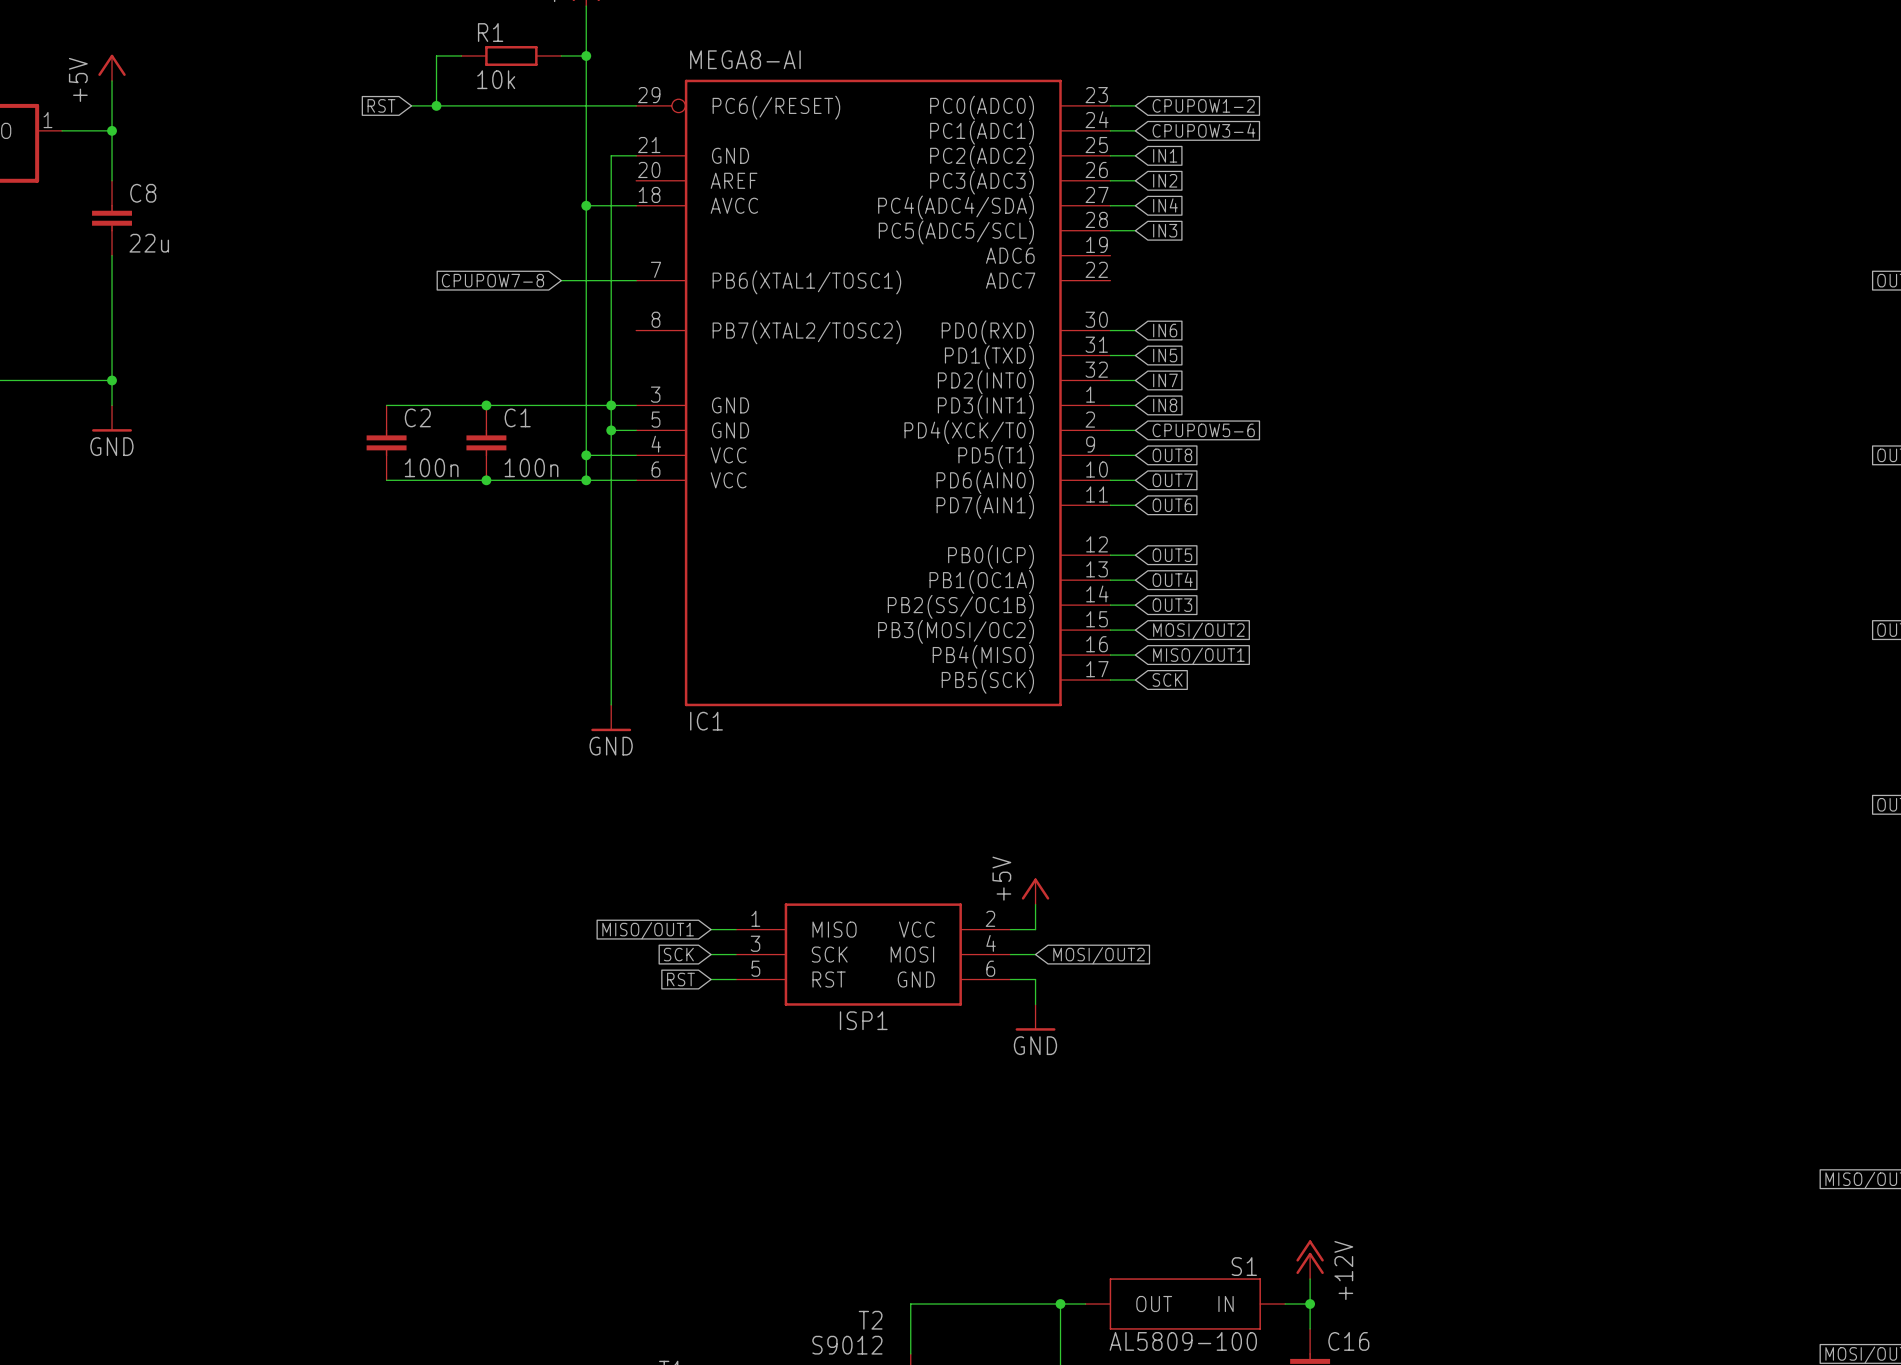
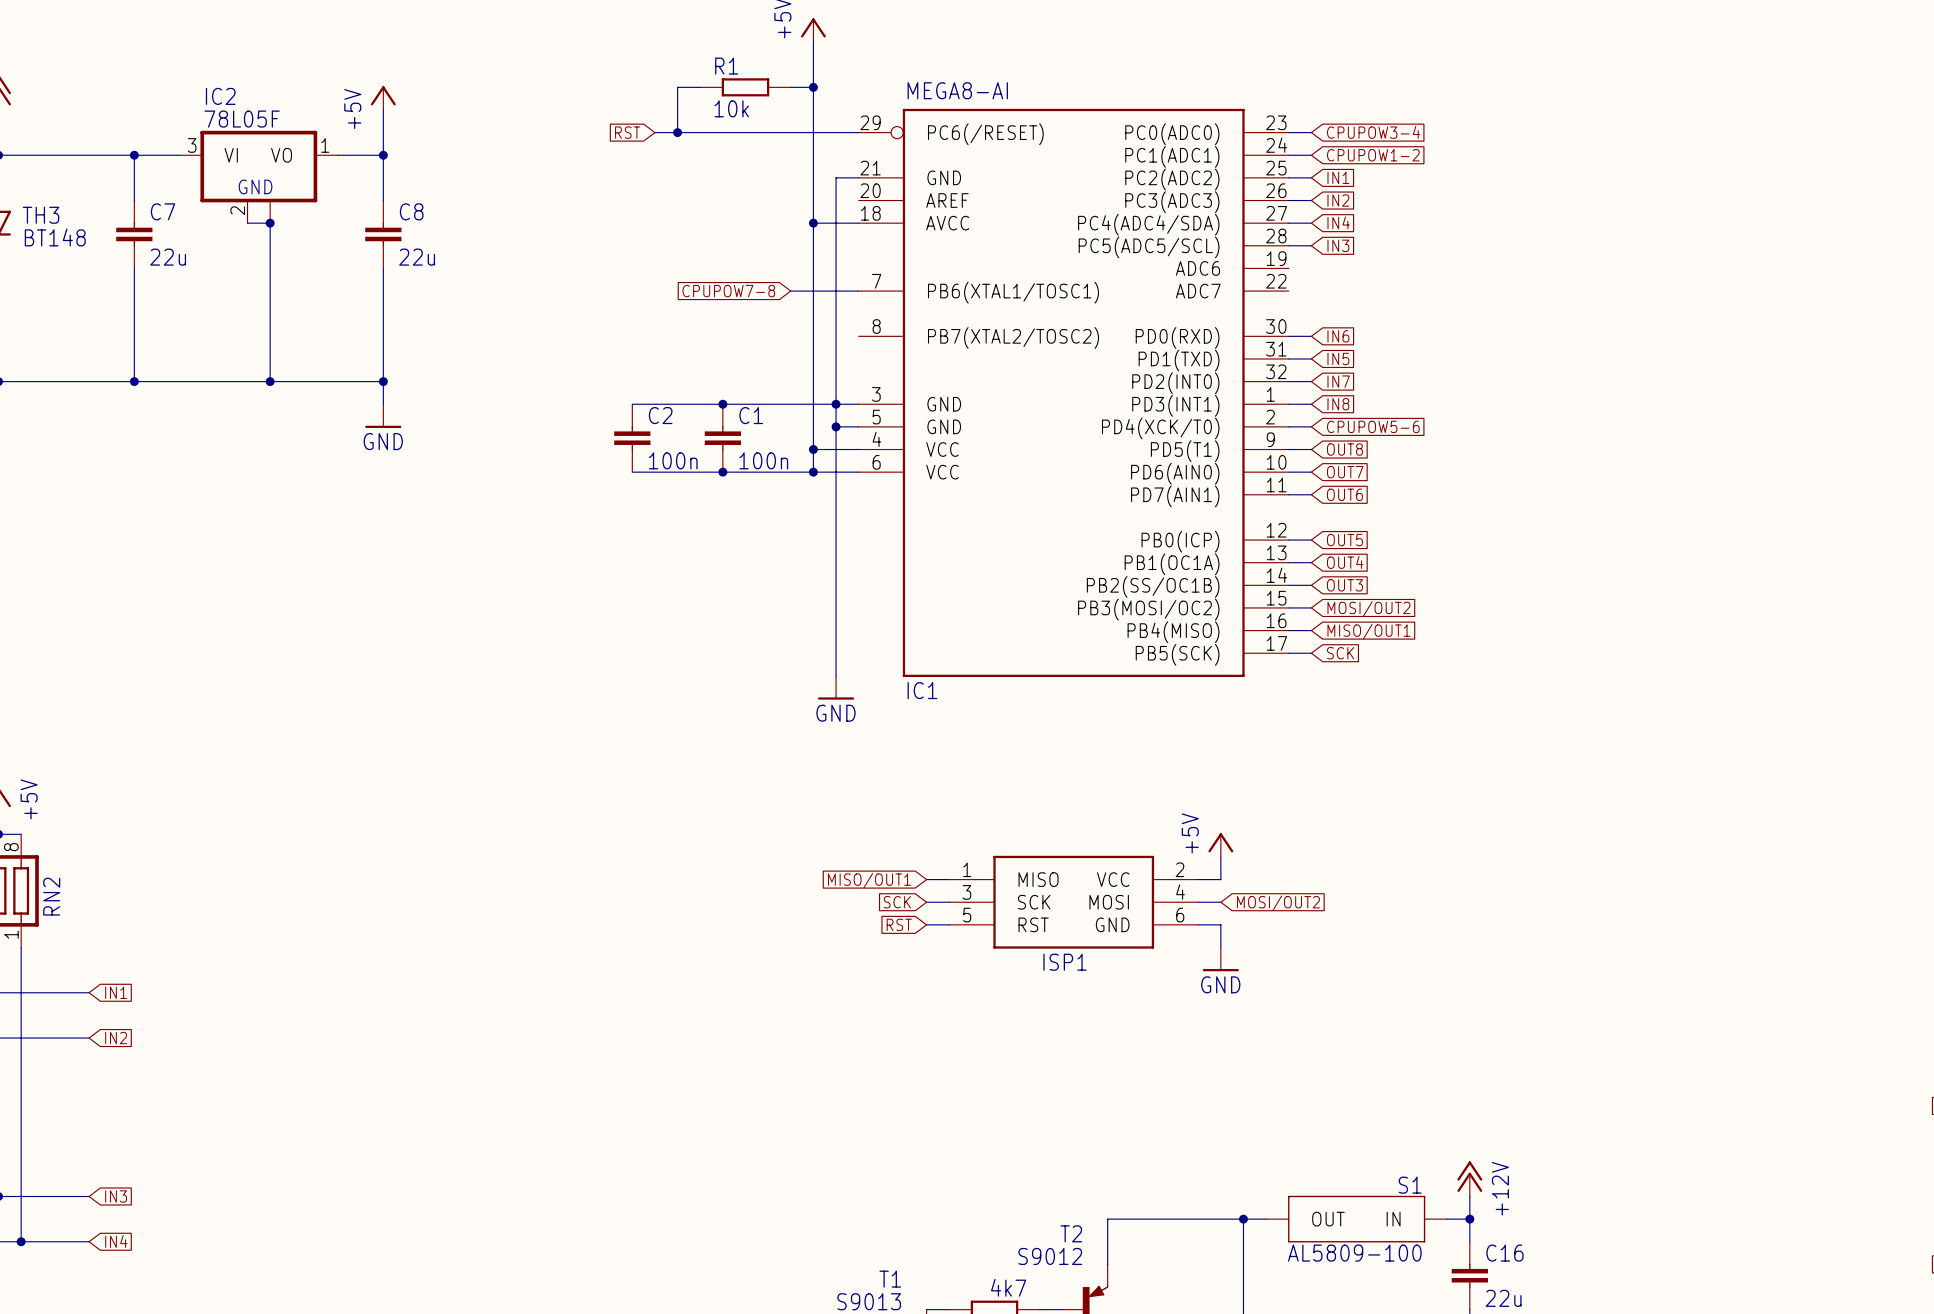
global label: CPUPOW1-2 (1203, 105) -> CPUPOW3-4 (1373, 132)
global label: CPUPOW3-4 (1203, 130) -> CPUPOW1-2 (1373, 155)

